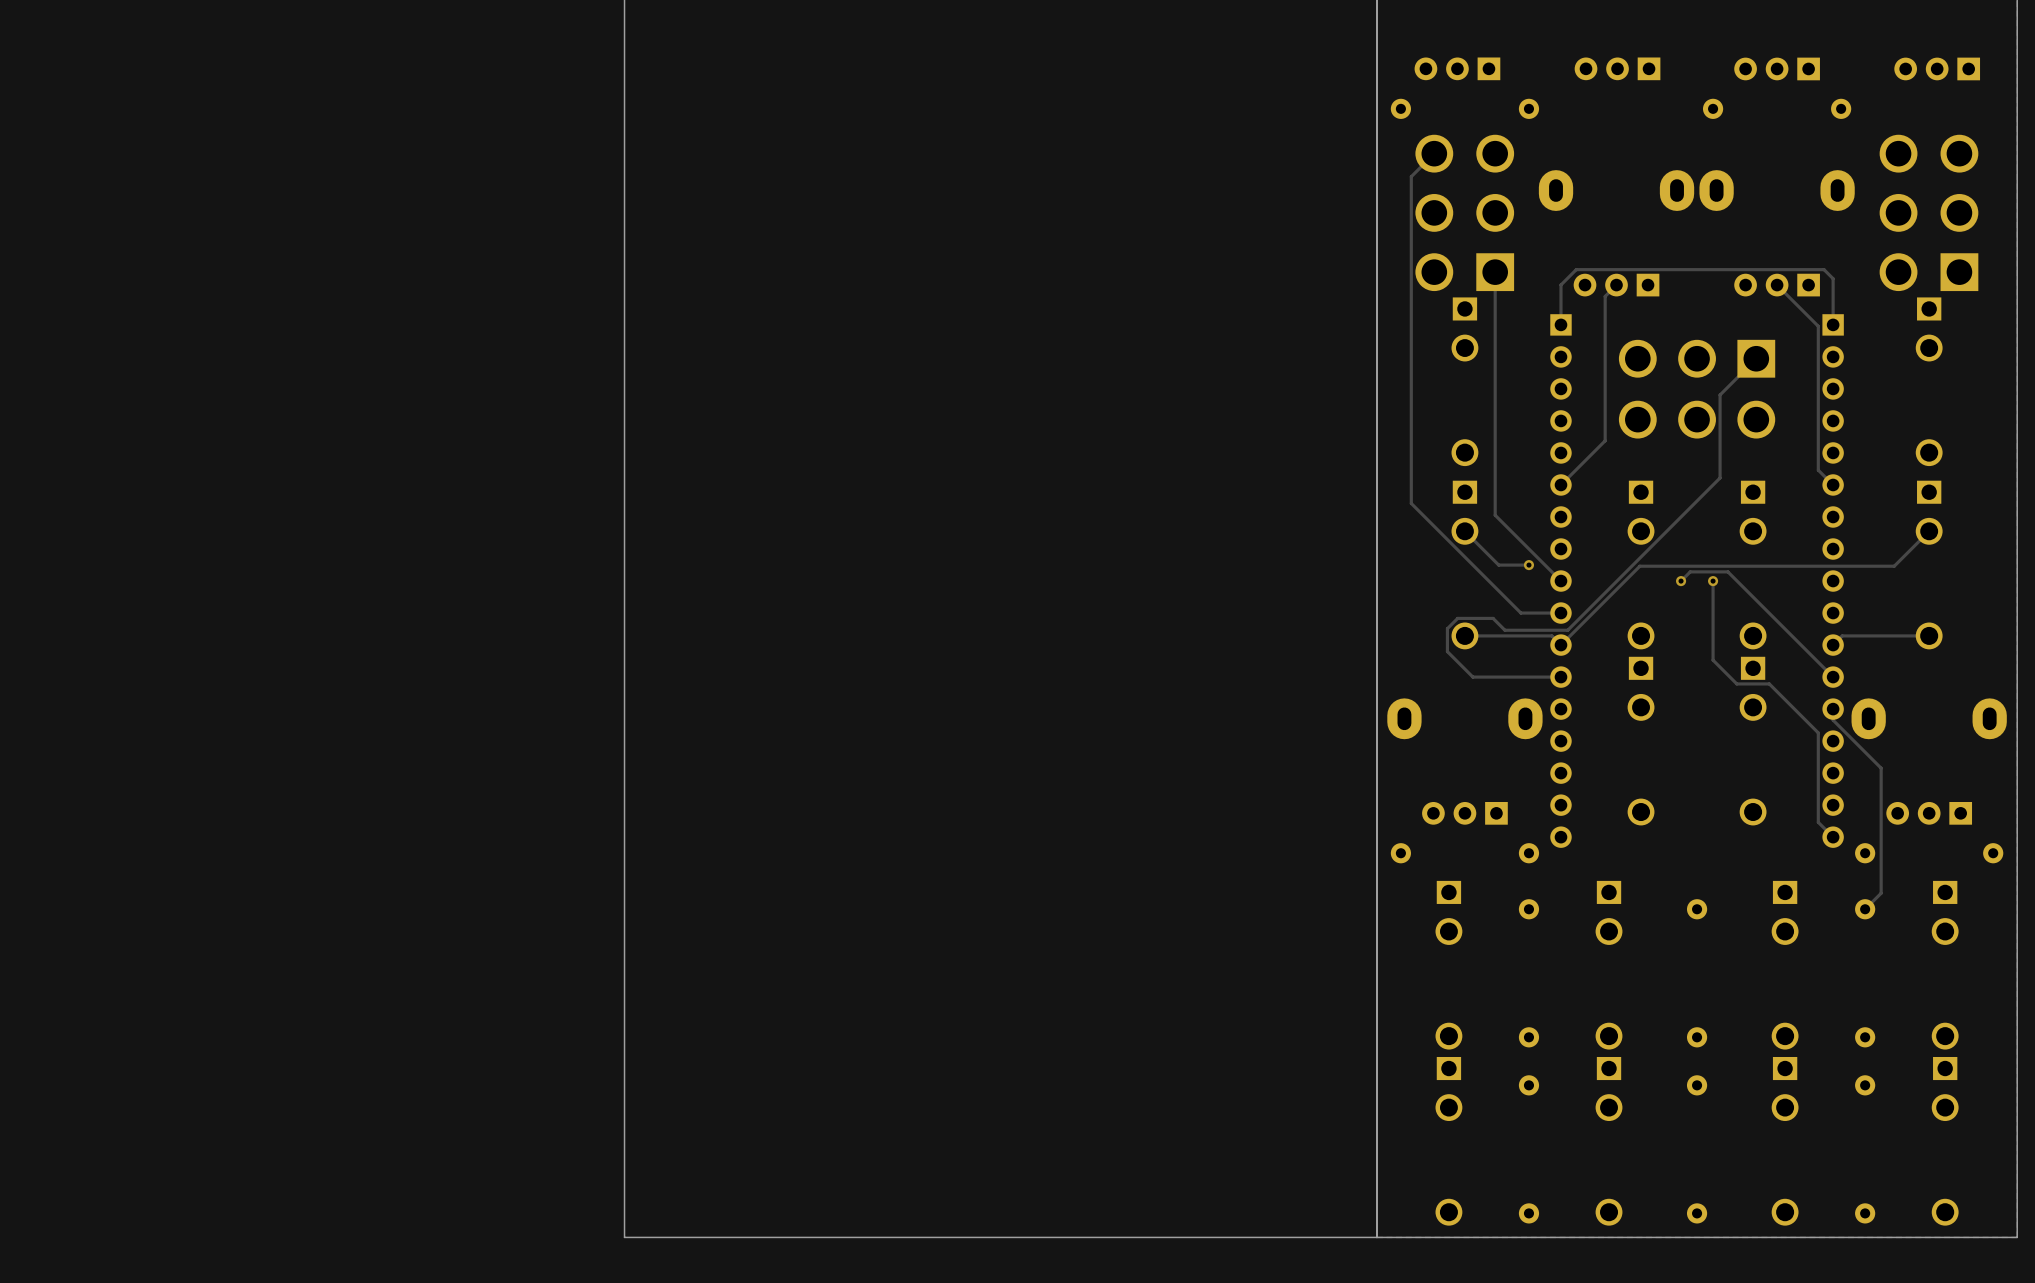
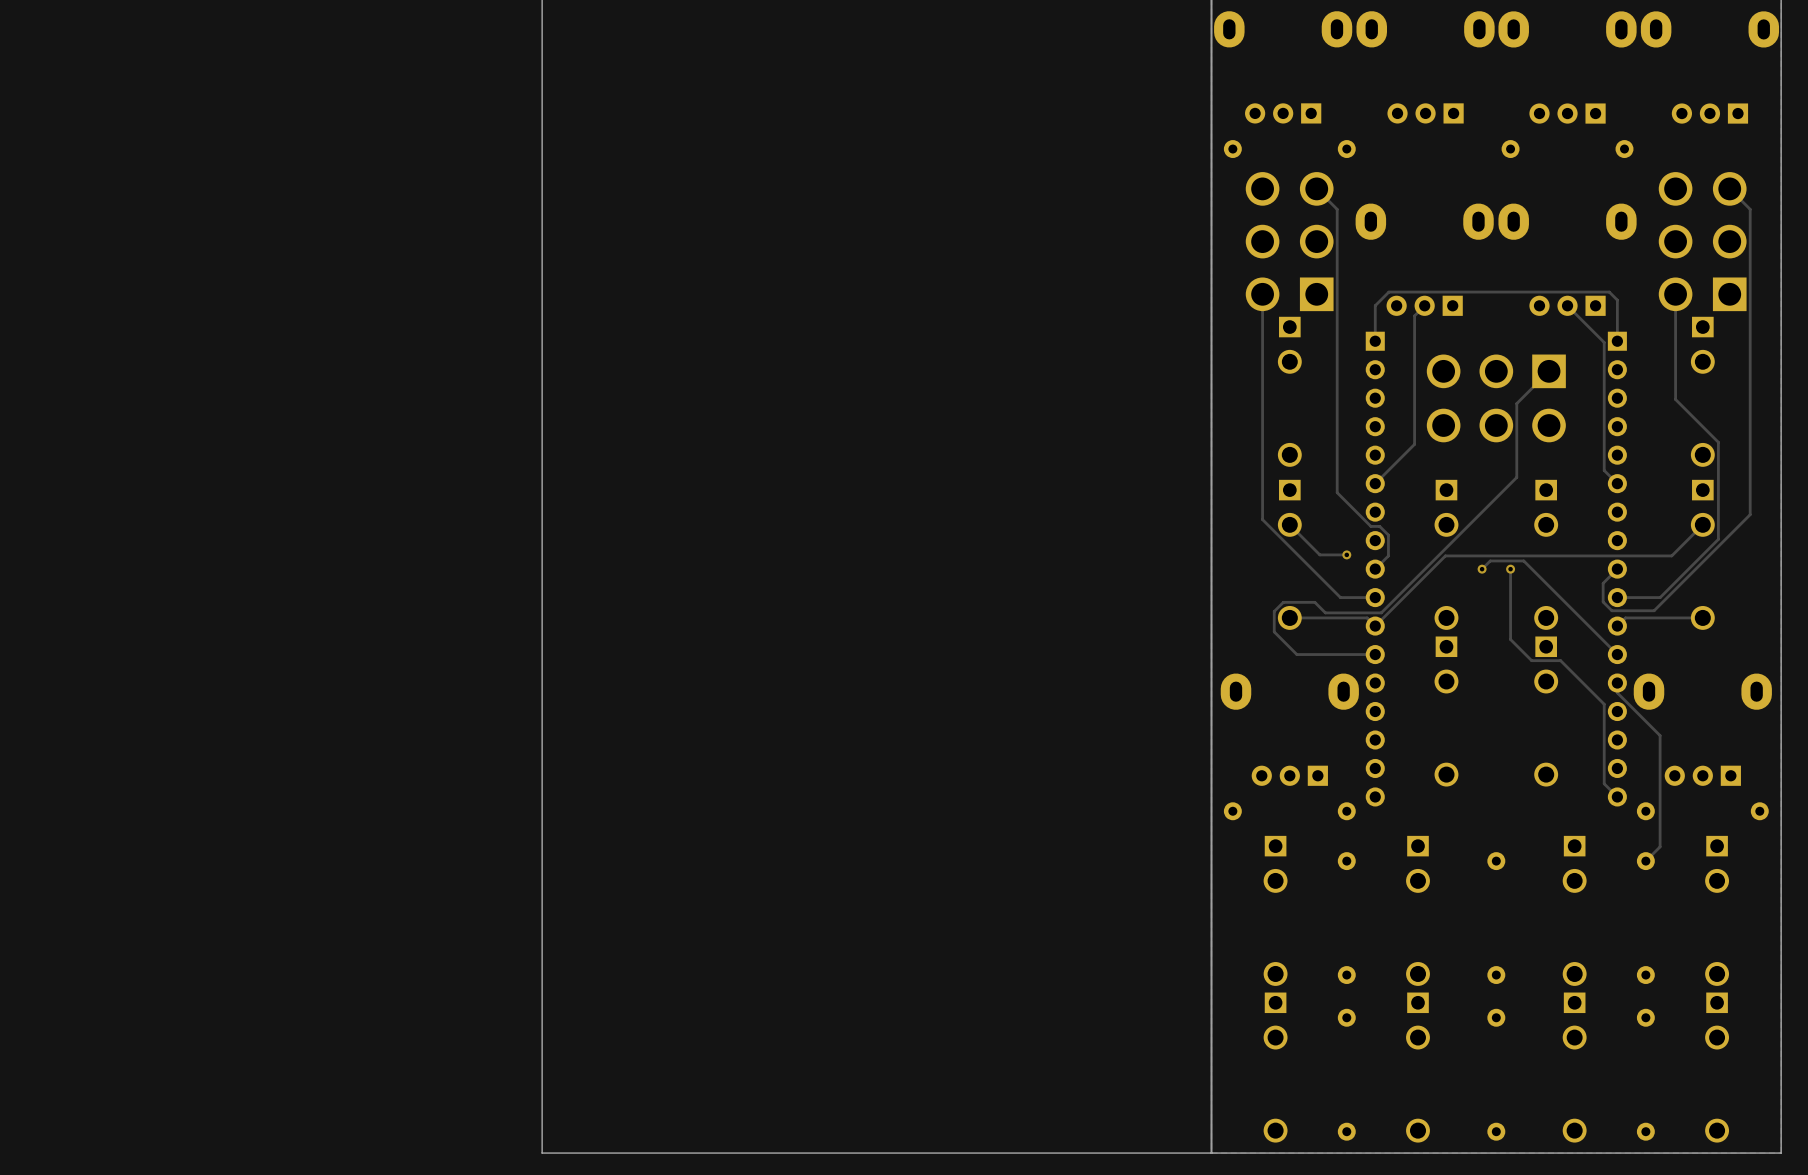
track: (1434, 153) (1411, 176) (1411, 503) (1521, 613) -> (1262, 294) (1262, 519) (1340, 597)
track: none -> (1729, 188) (1750, 209) (1750, 514) (1654, 610) (1611, 610) (1603, 601) (1603, 583) (1617, 569)
track: (1495, 272) (1495, 515) (1560, 581) -> (1316, 188) (1337, 209) (1337, 492) (1370, 526) (1379, 526) (1388, 535) (1388, 555) (1375, 569)
track: none -> (1675, 294) (1675, 399) (1718, 442) (1718, 539) (1660, 597) (1617, 597)

